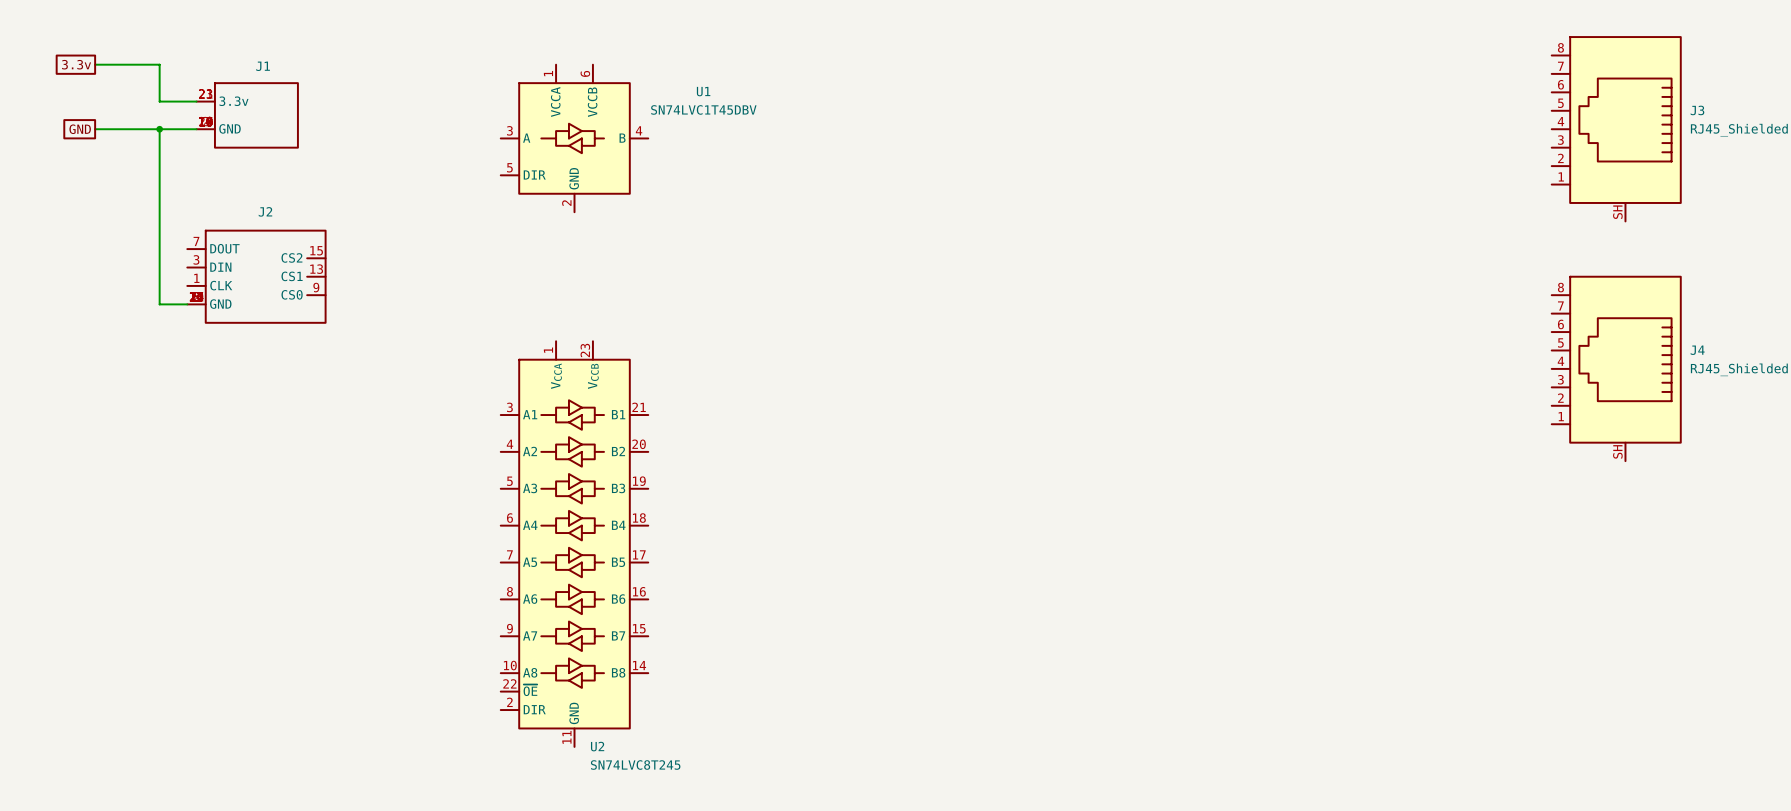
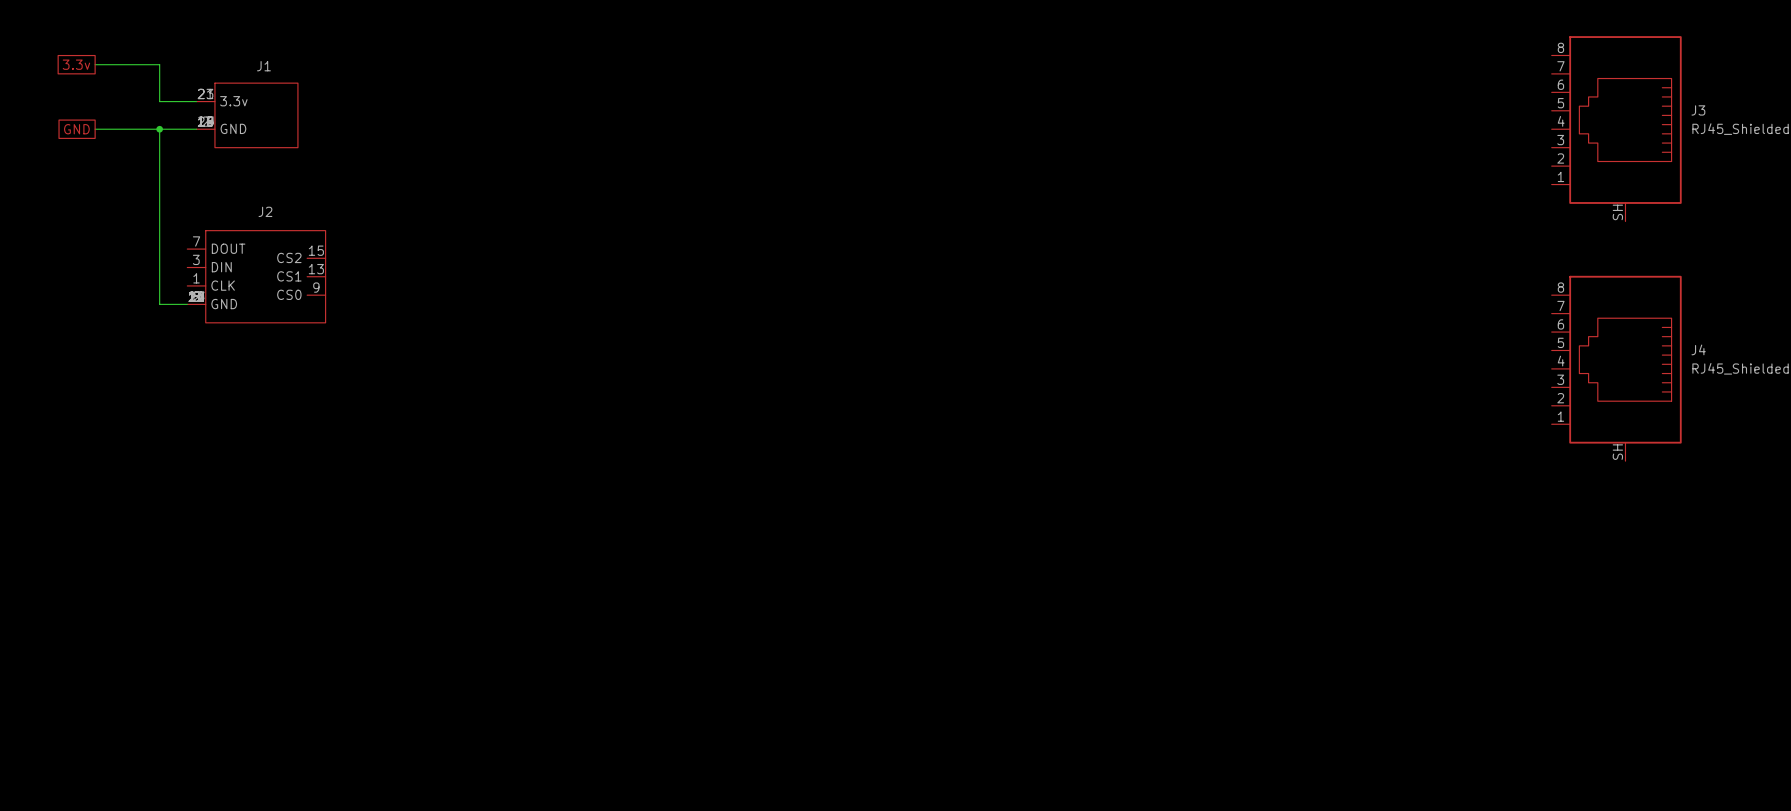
U1: SN74LVC1T45DBV (574, 138) -> none
U2: SN74LVC8T245 (574, 544) -> none

